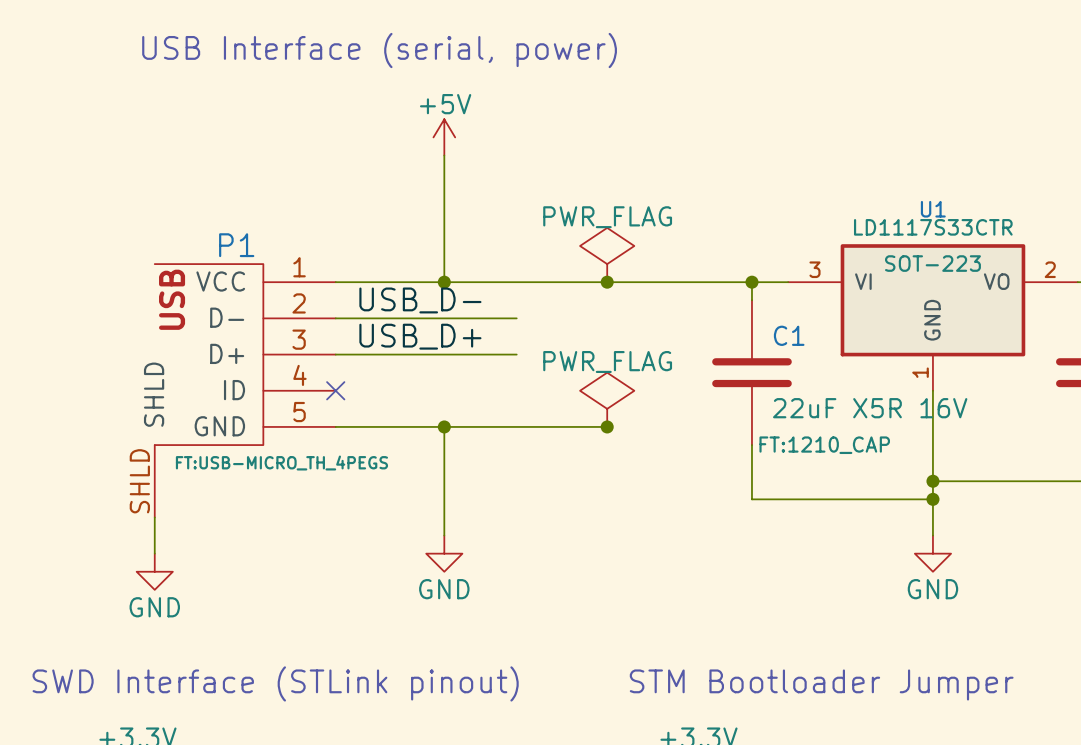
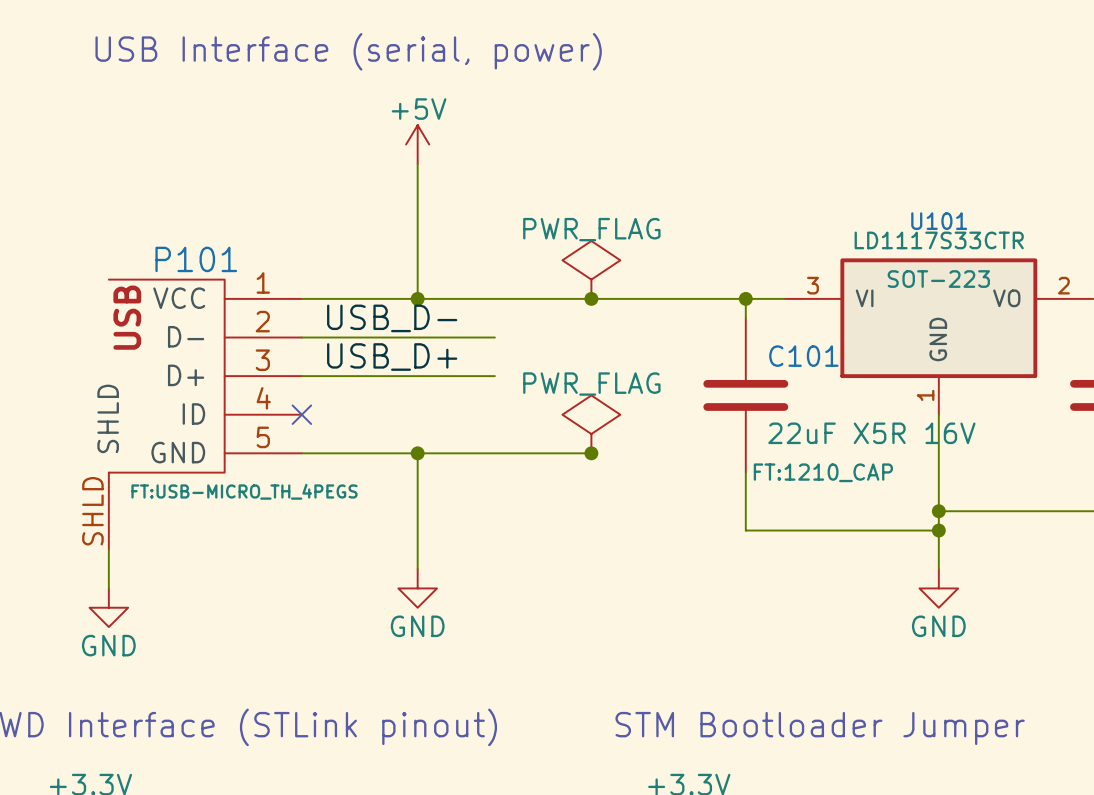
U1 name: U1 (933, 209) -> U101 (939, 221)
P1 name: P1 (236, 245) -> P101 (196, 259)
C1 name: C1 (789, 335) -> C101 (803, 356)

